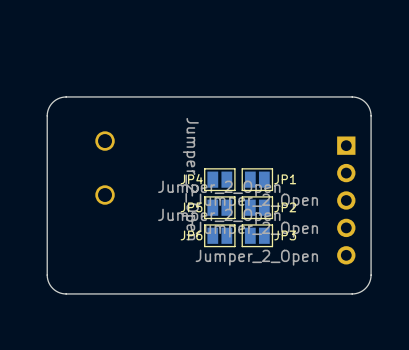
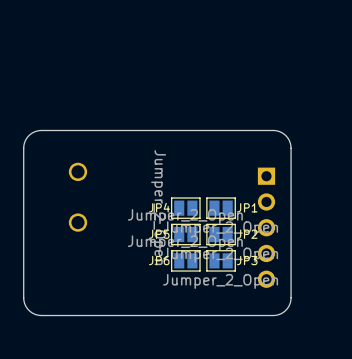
board edge: (312, 96) (358, 98) (368, 105) (371, 115) (370, 281) (363, 289) (356, 293) (312, 293) -> (273, 130) (285, 135) (291, 148) (290, 299) (285, 310) (273, 315)
part position: (346, 200) -> (266, 227)

